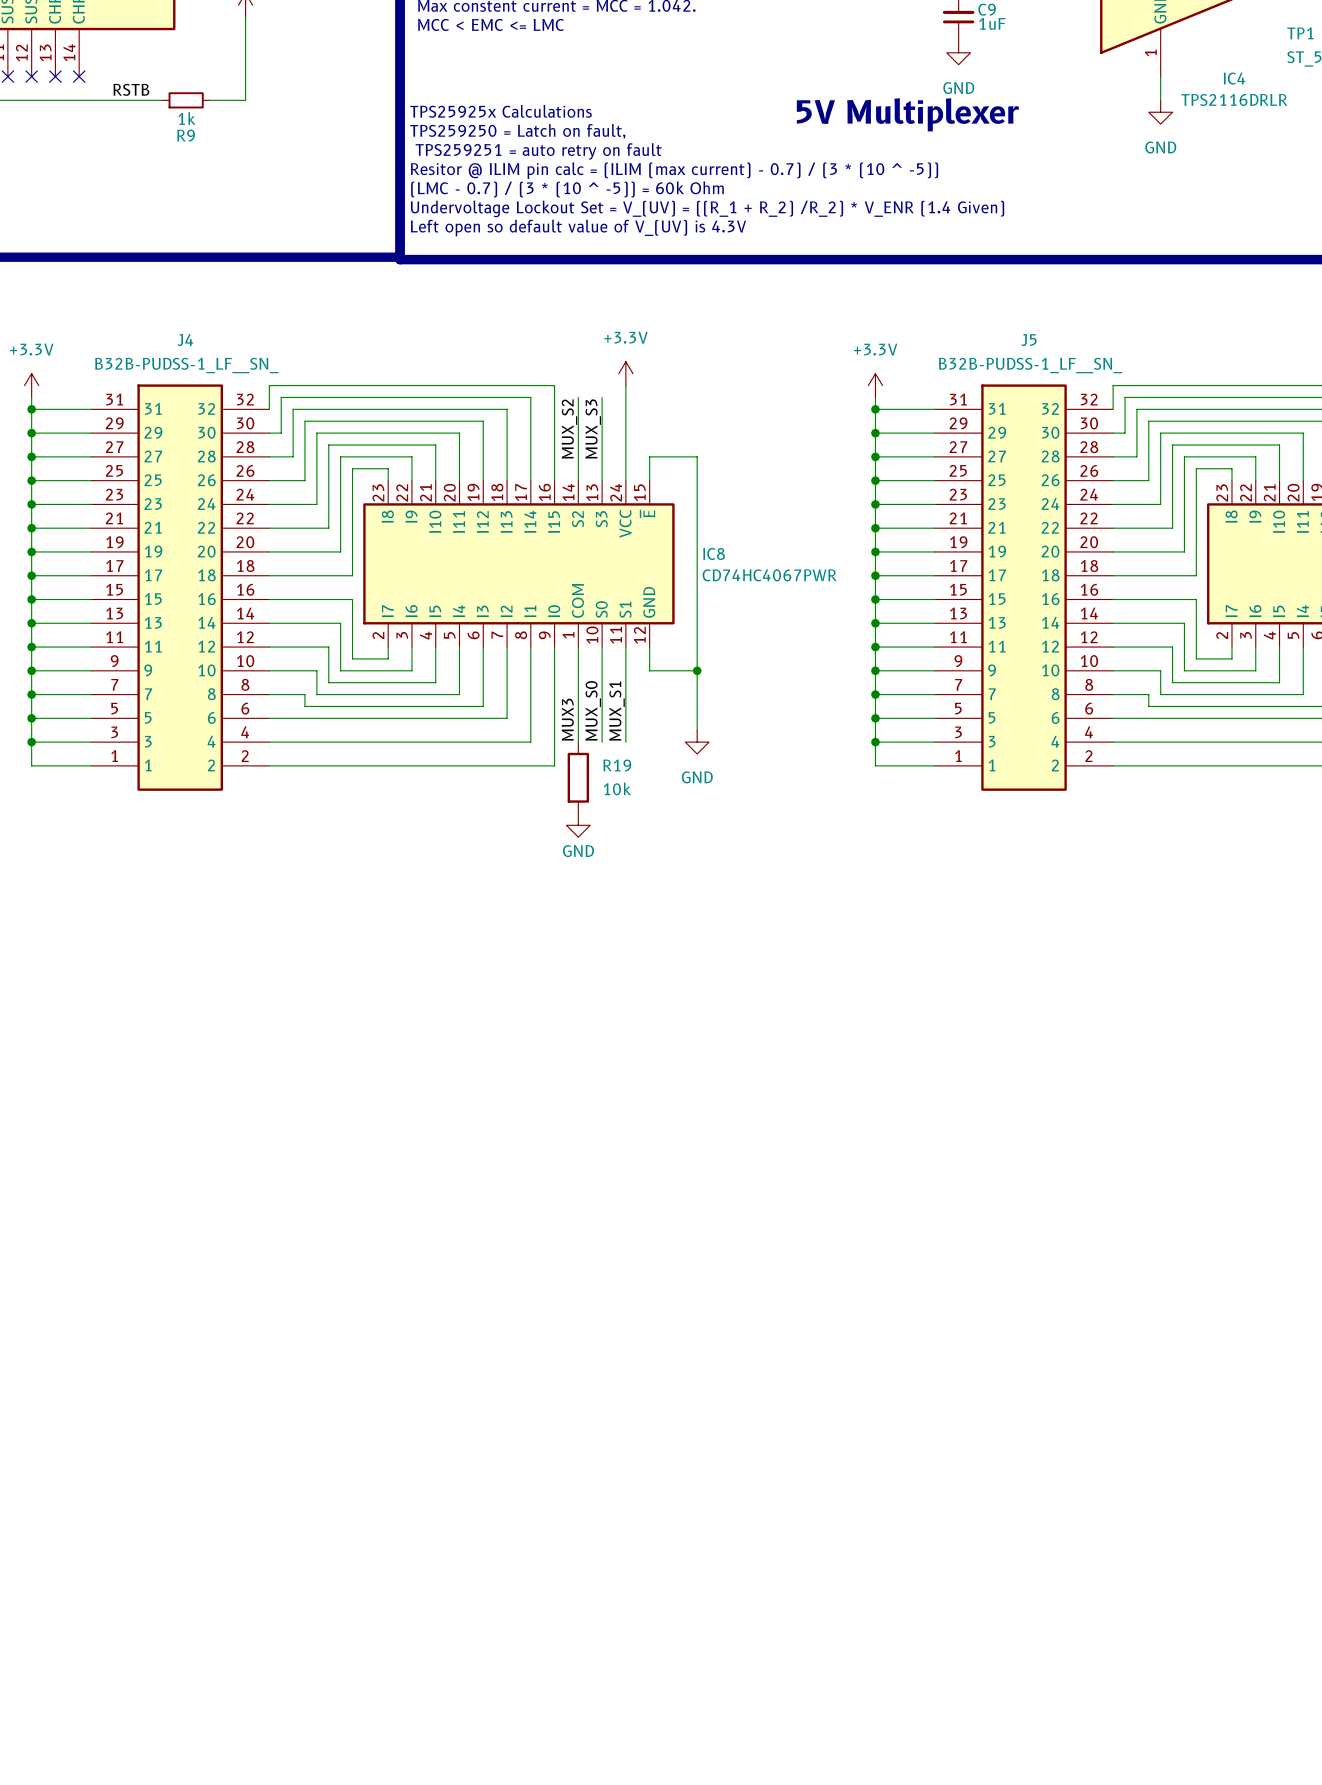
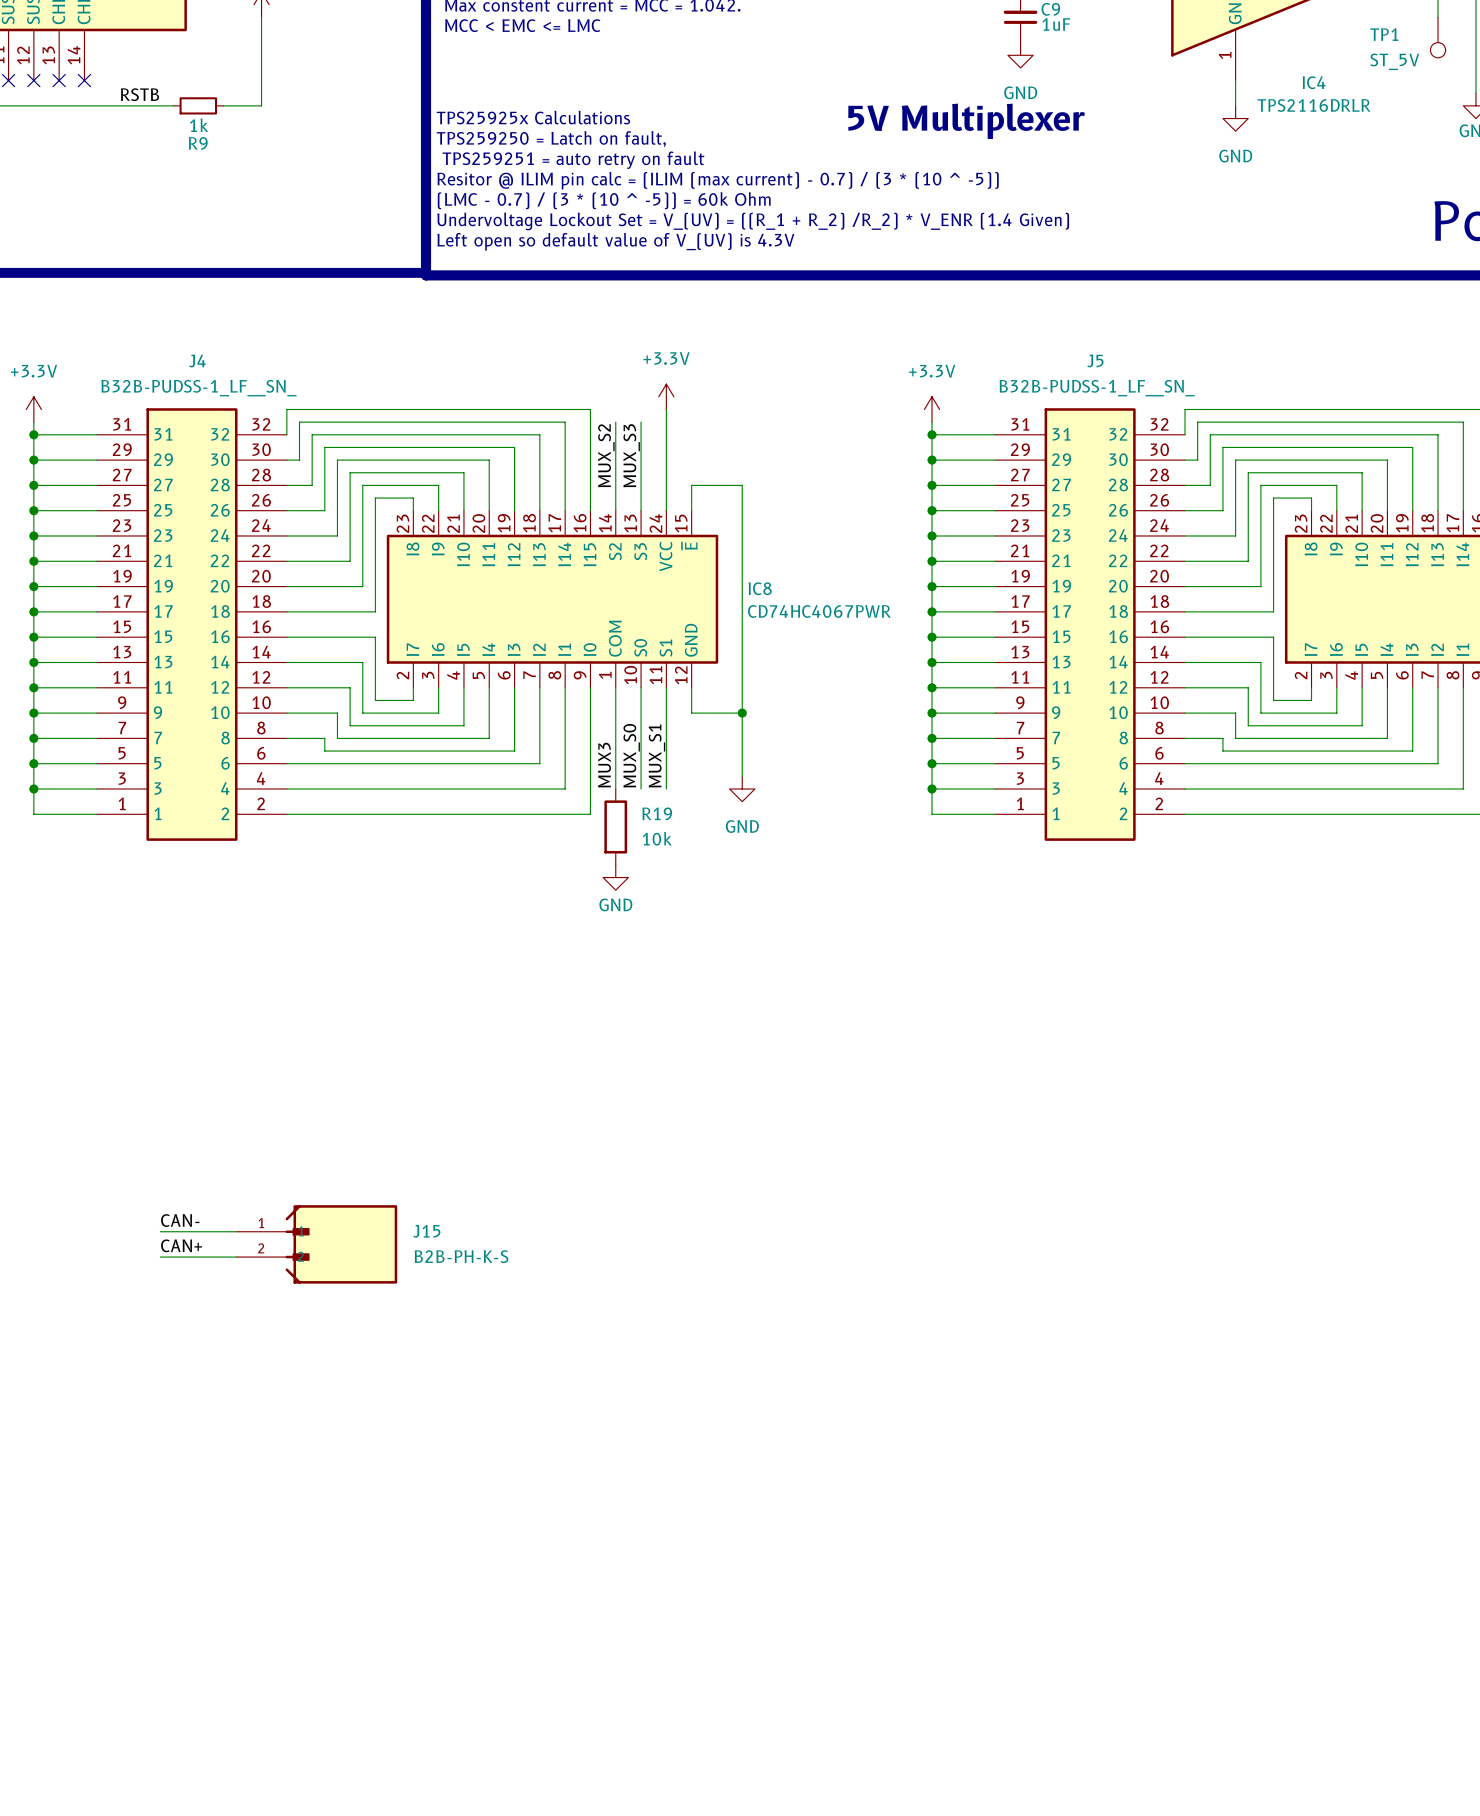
label: none -> CAN- (180, 1220)
wire: none -> (160, 1231) (236, 1231)
J15: none -> B2B-PH-K-S (316, 1244)
label: none -> CAN+ (181, 1245)
wire: none -> (160, 1257) (236, 1257)

